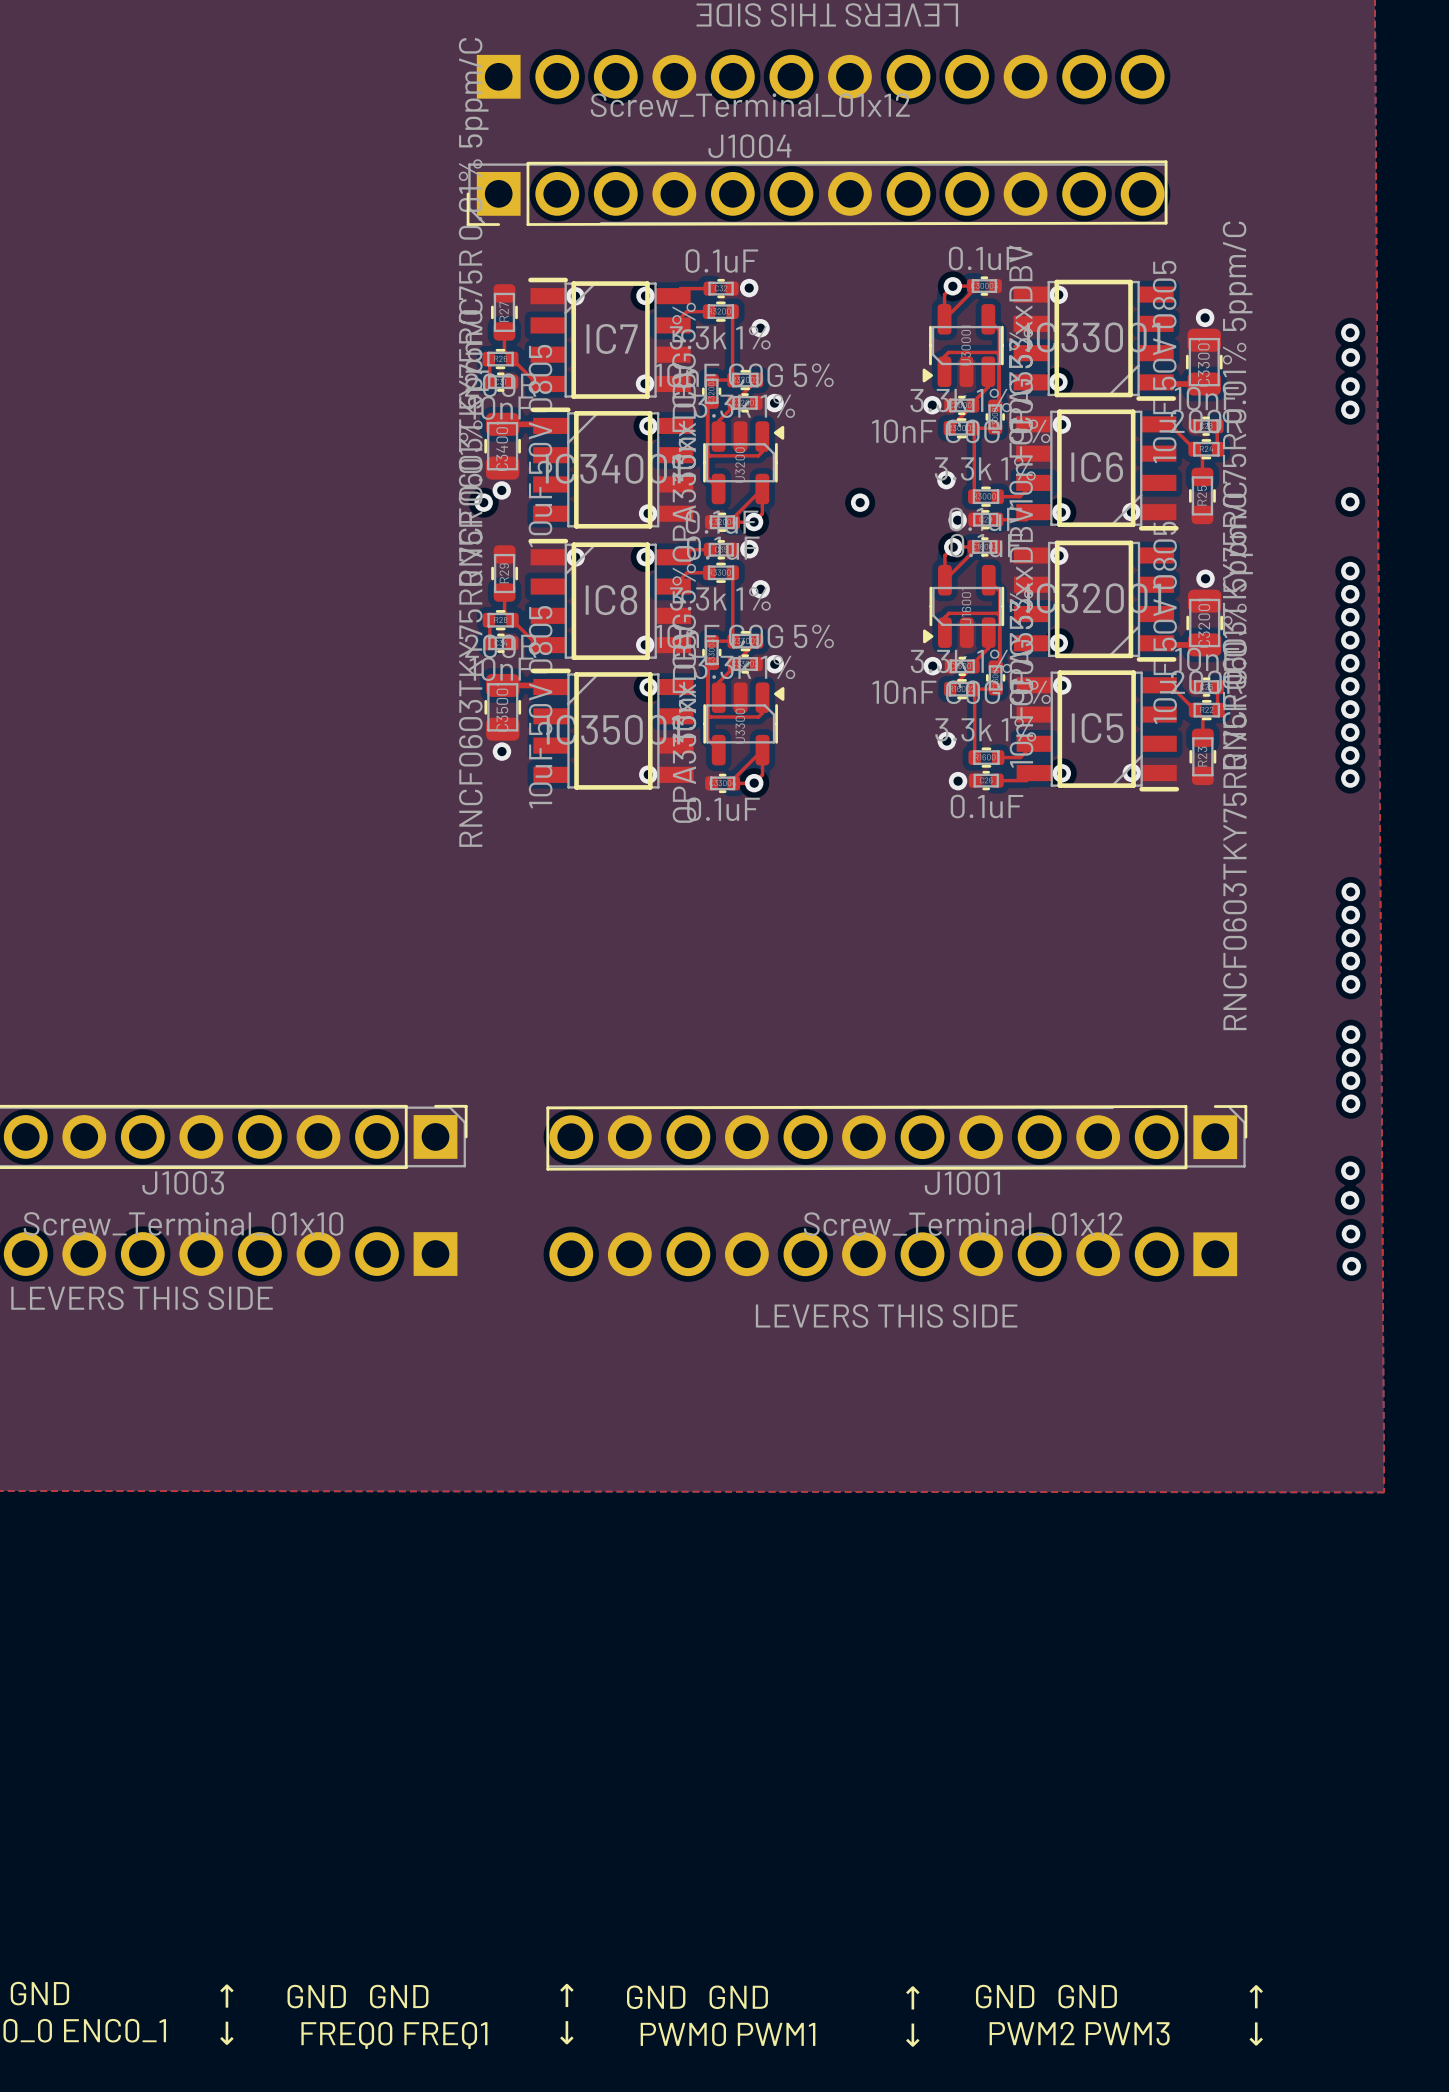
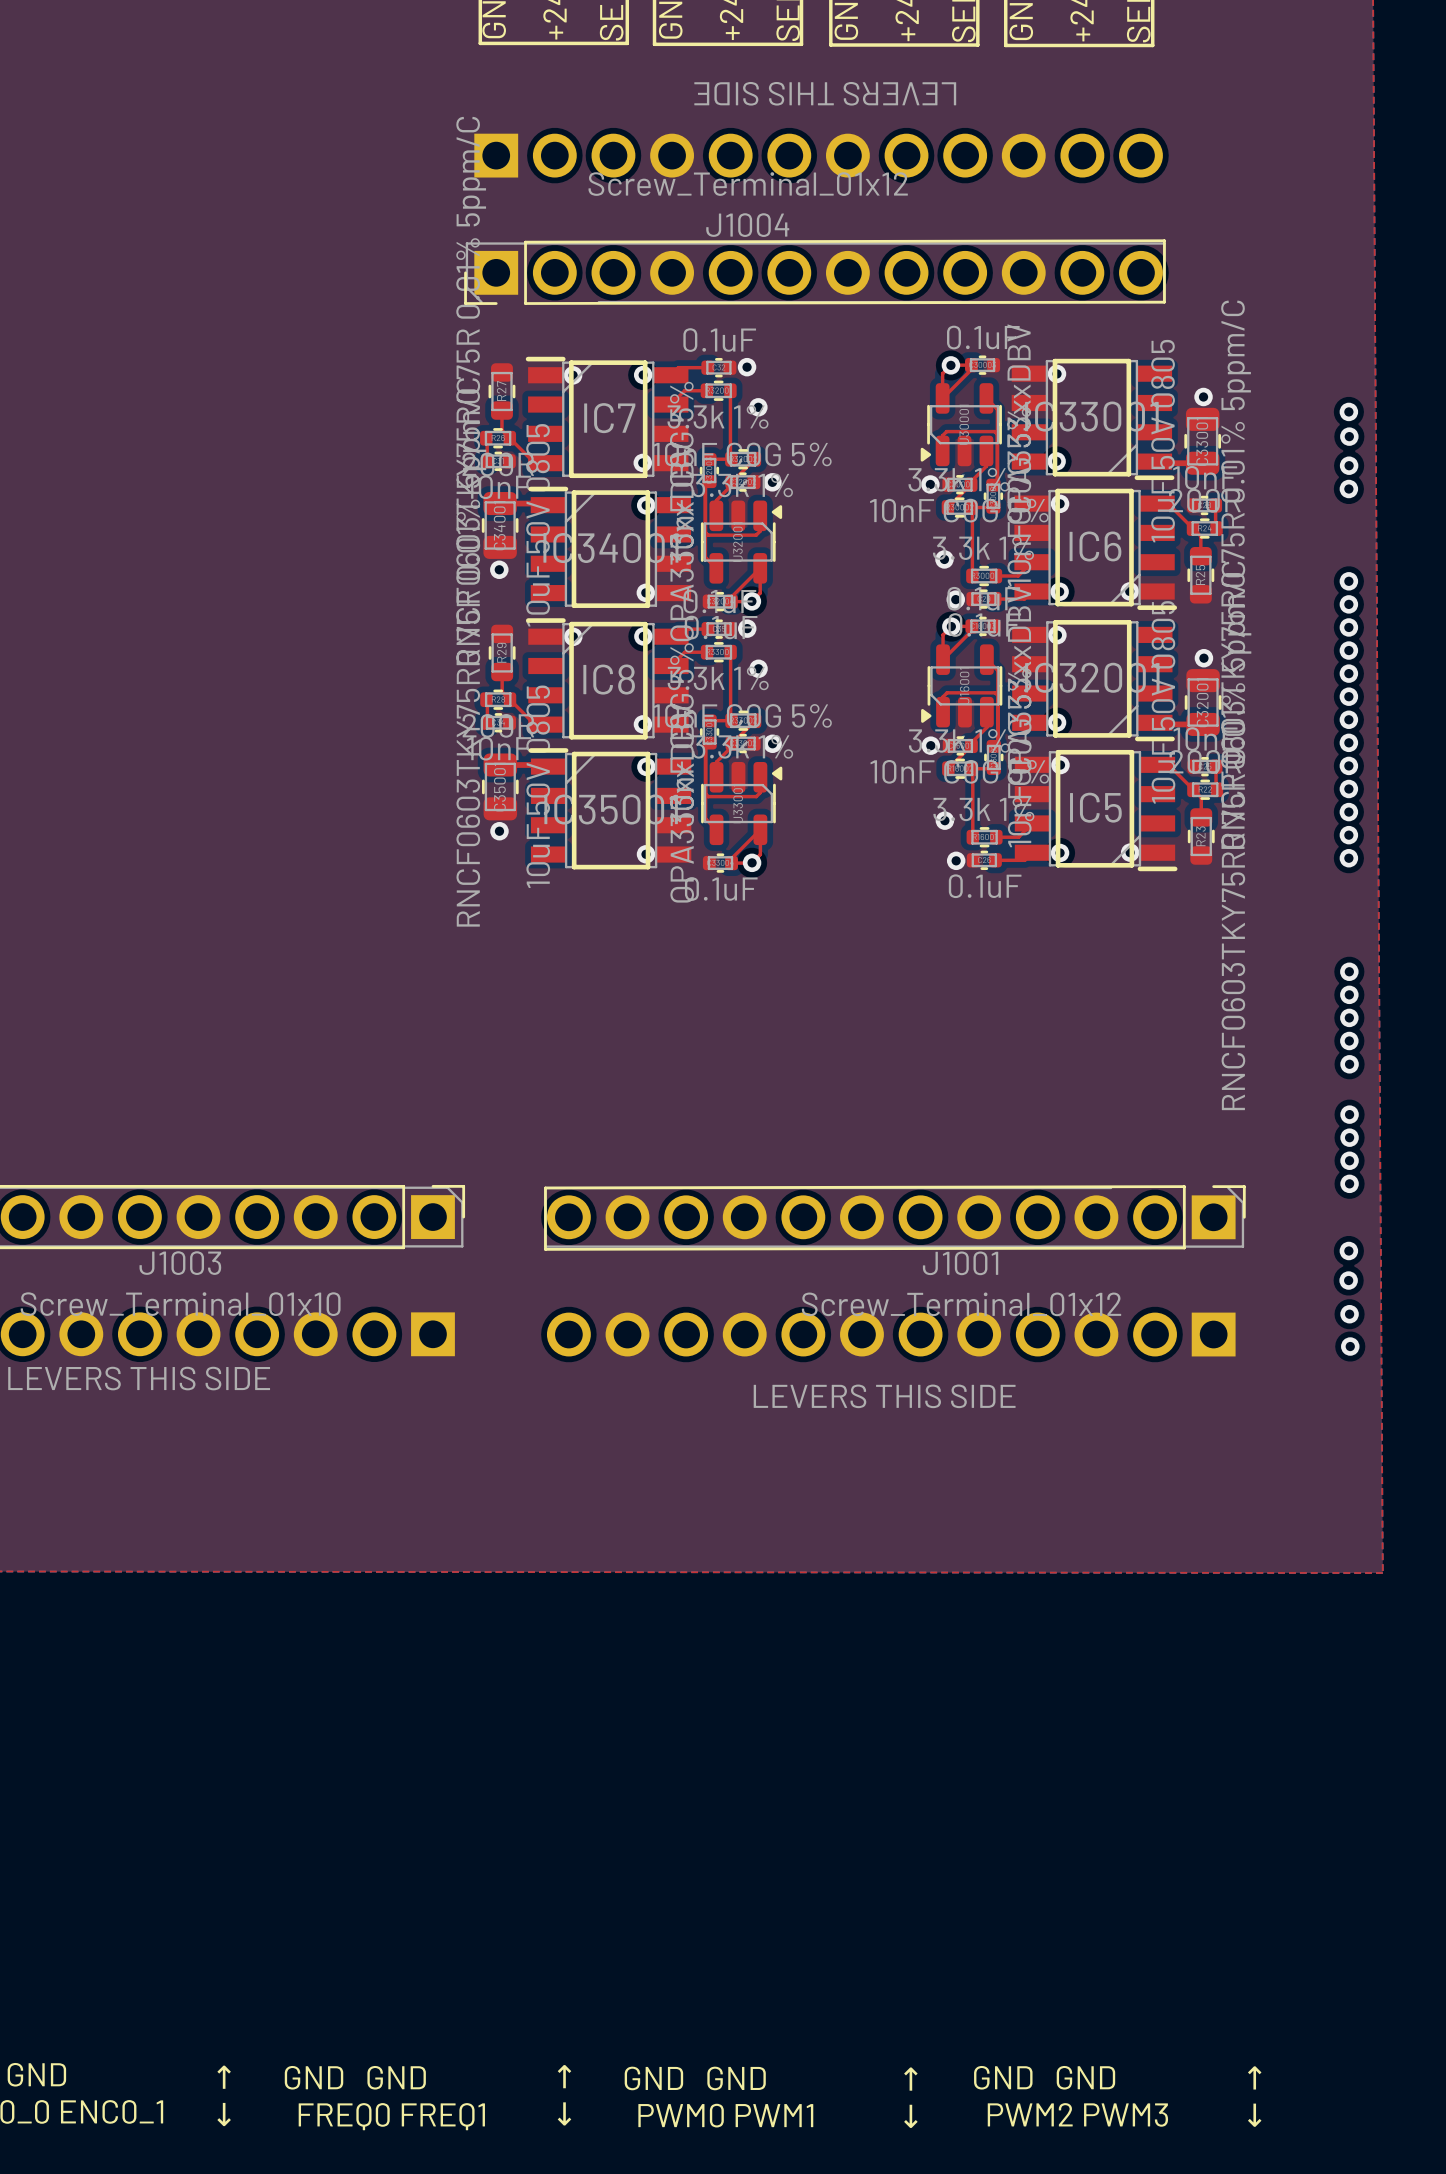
via: (483, 502) -> none
via: (860, 502) -> none
via: none -> (1348, 604)
via: none -> (1348, 627)

